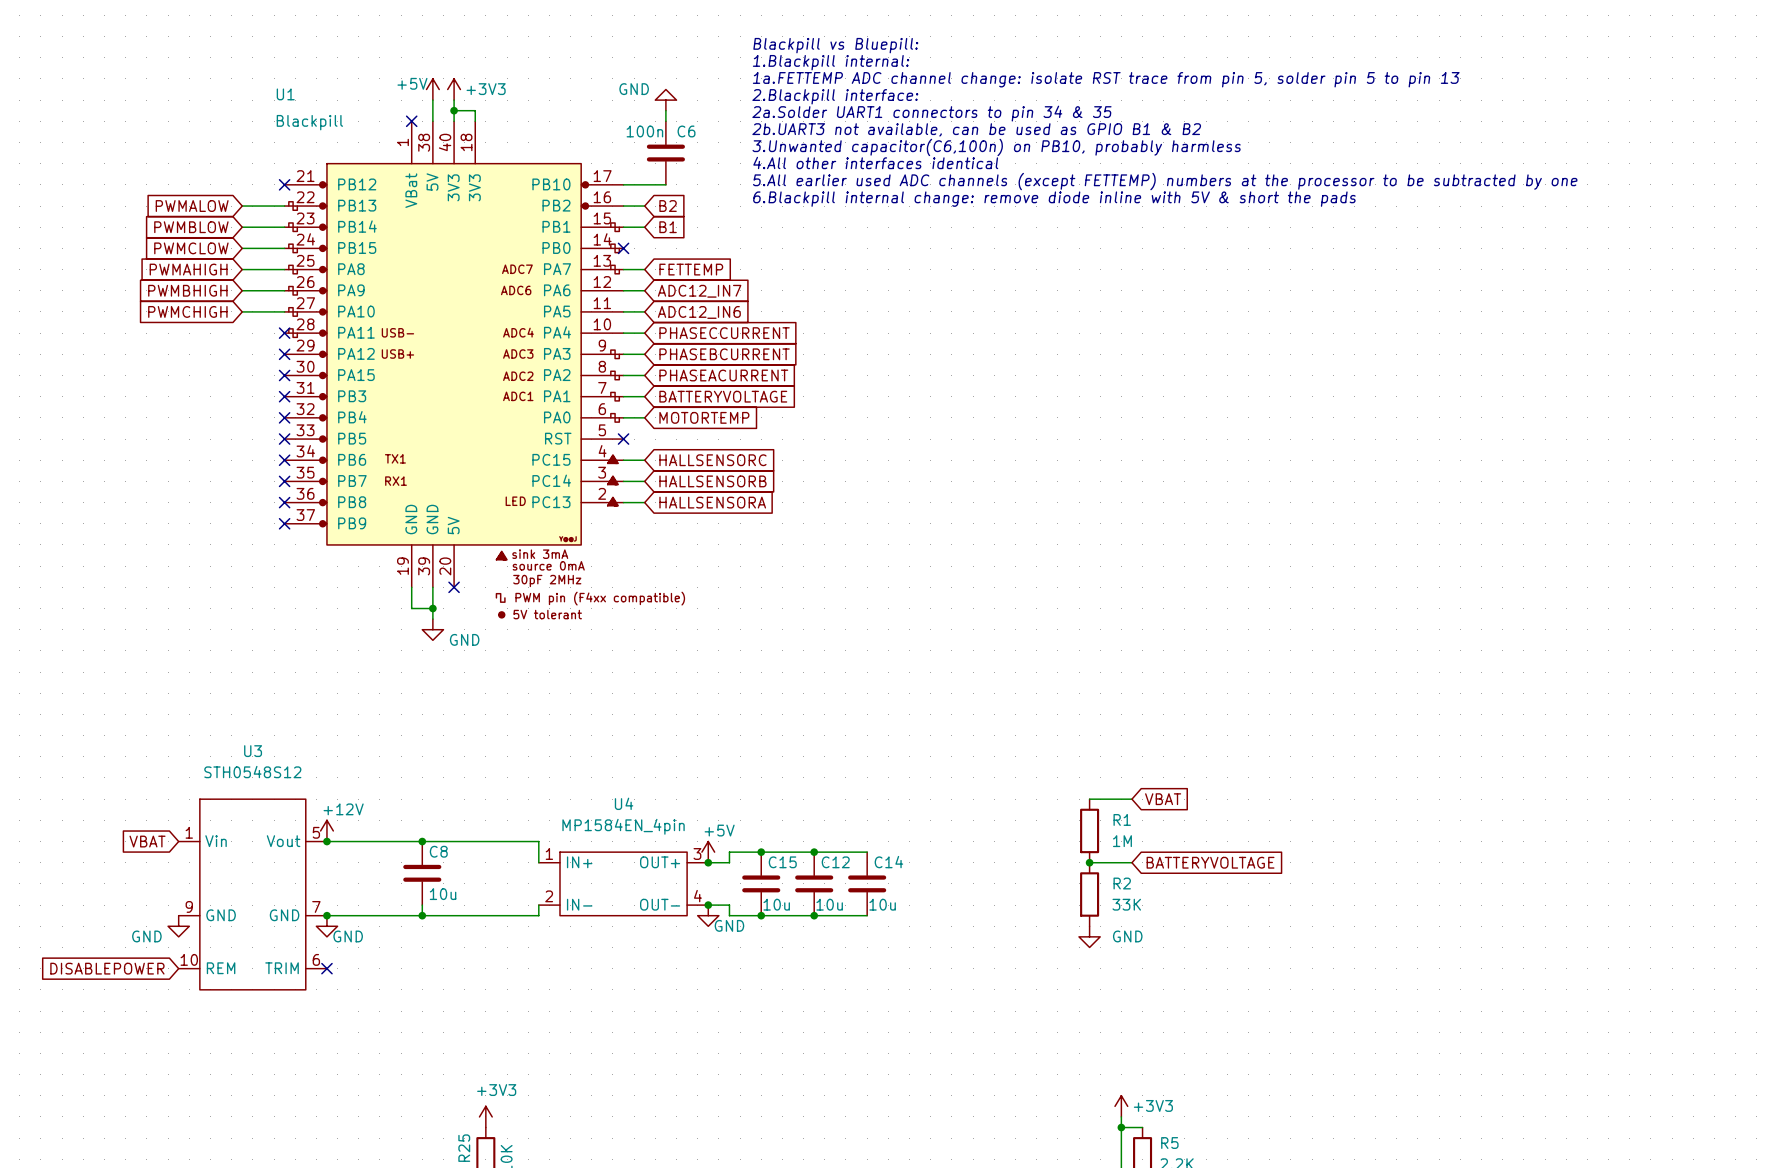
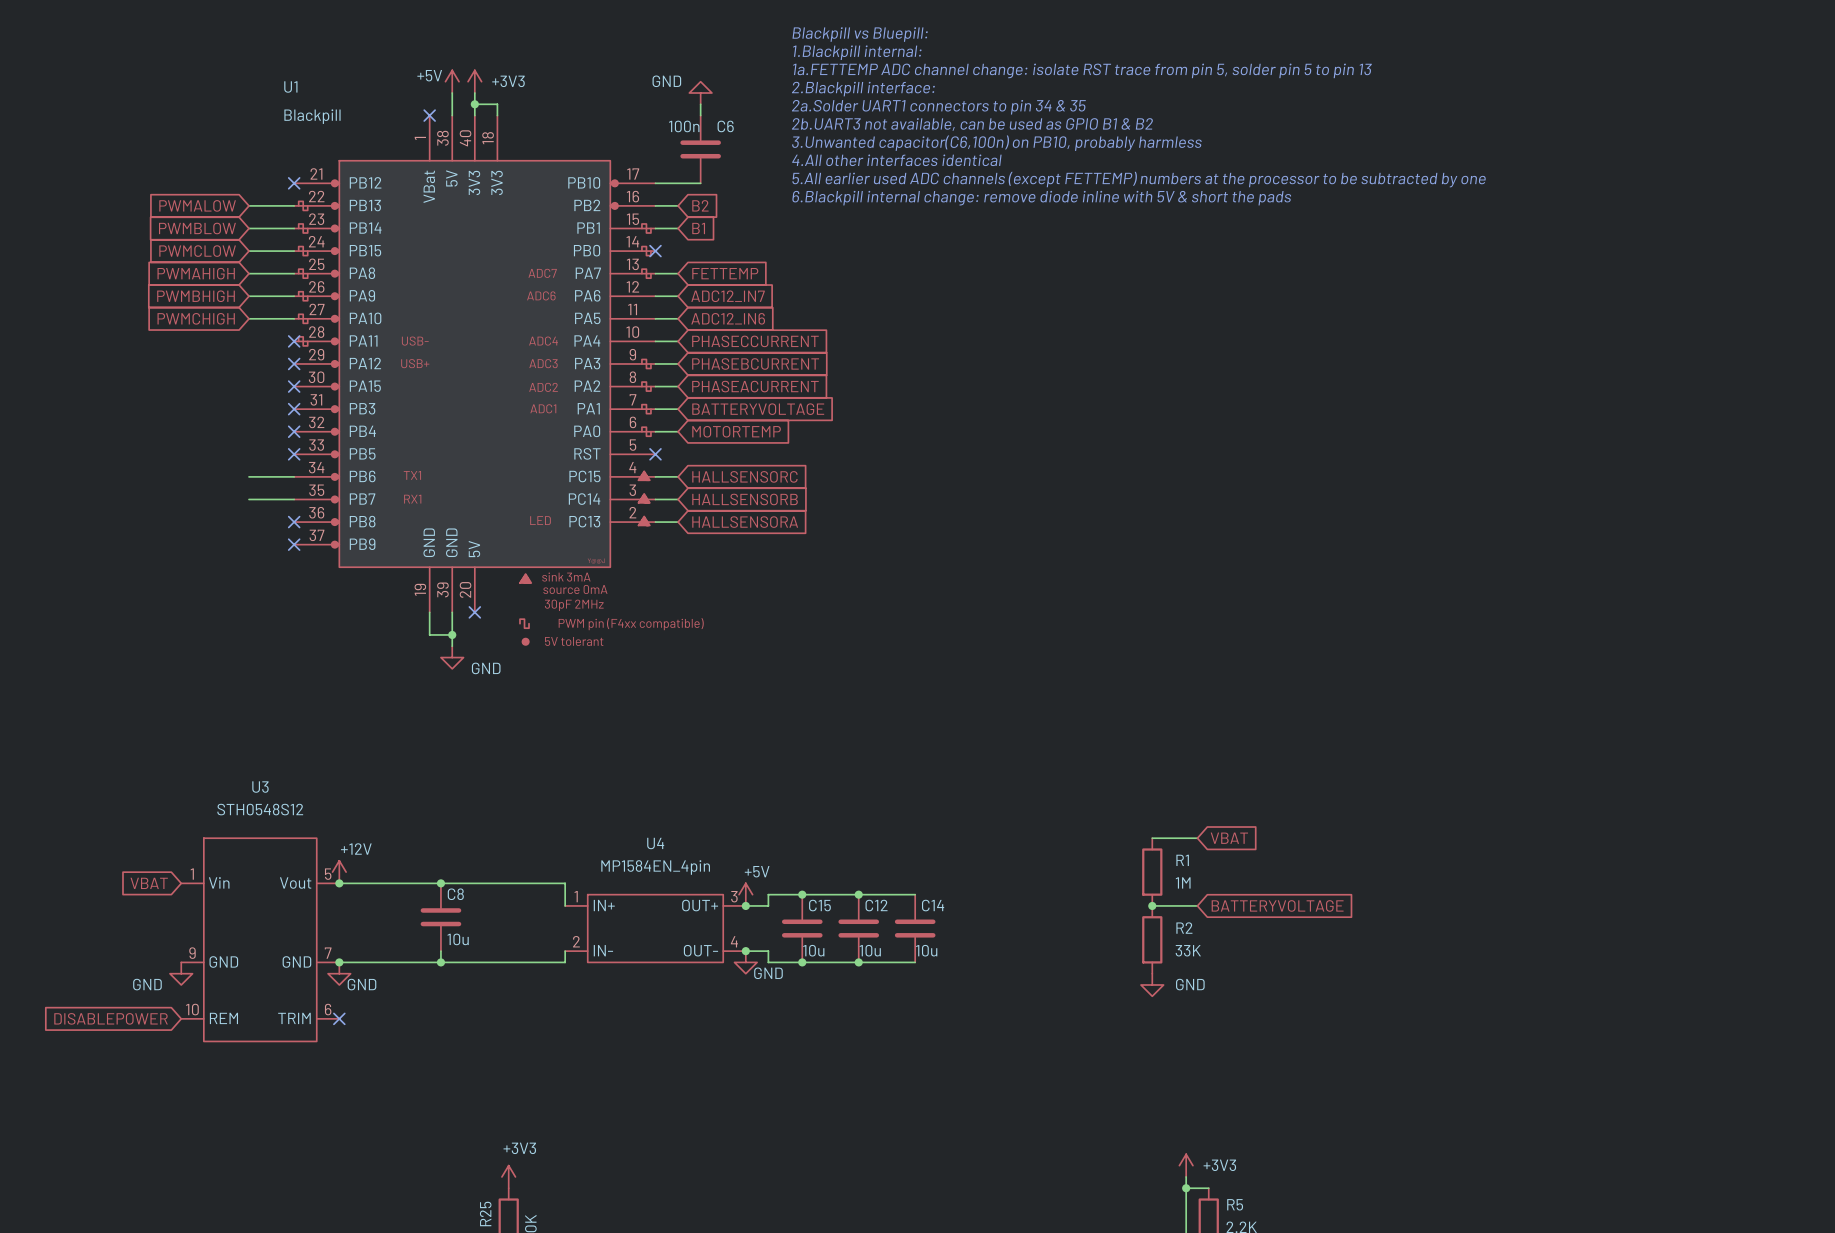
wire: none -> (249, 476) (294, 476)
no-connect mark: (284, 460) -> none
wire: none -> (249, 499) (294, 499)
no-connect mark: (284, 481) -> none

